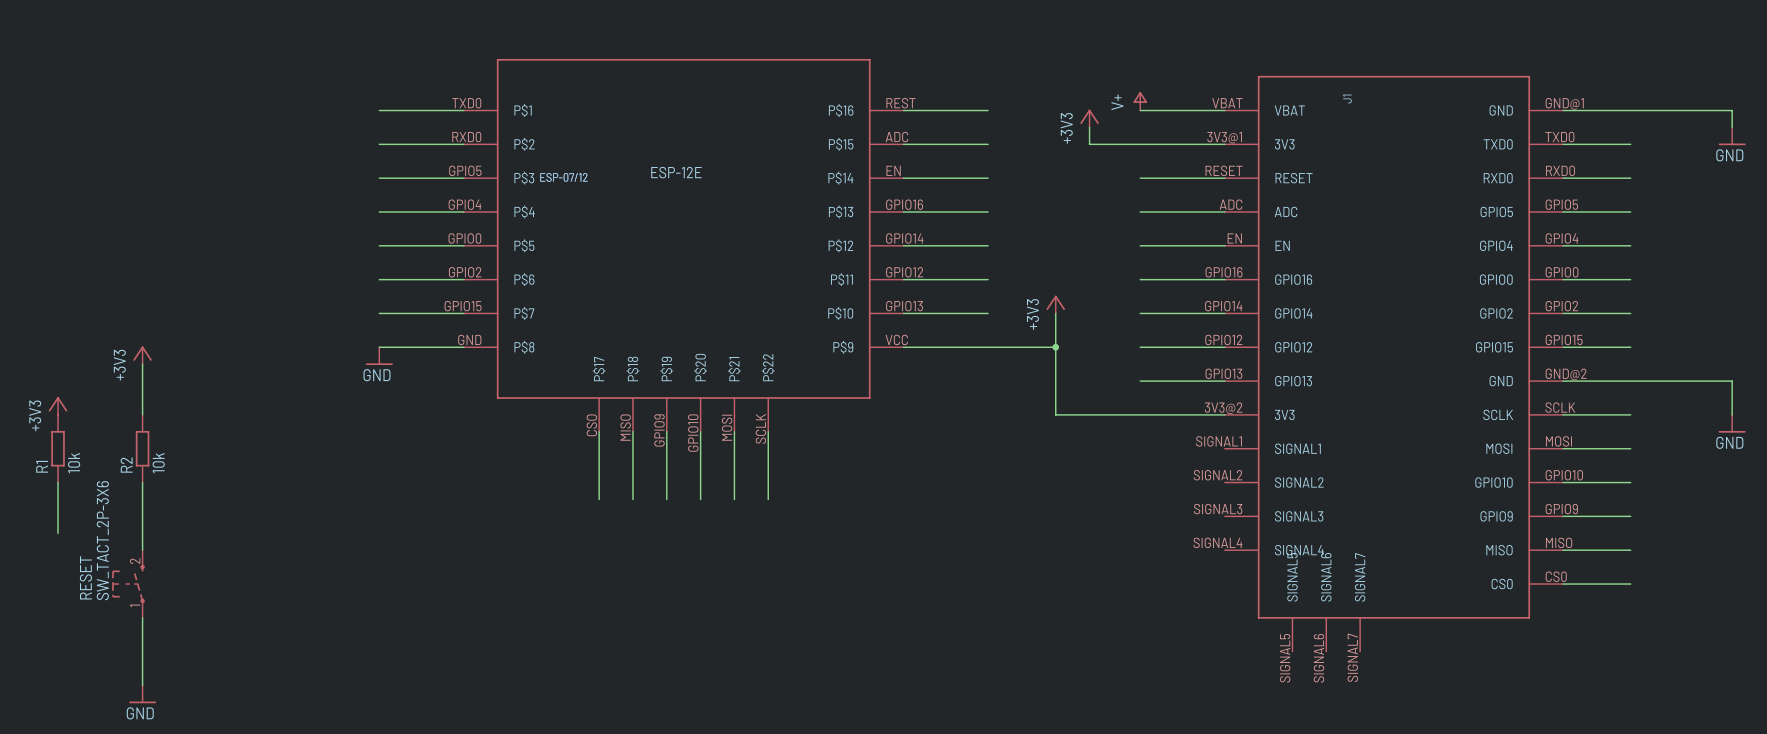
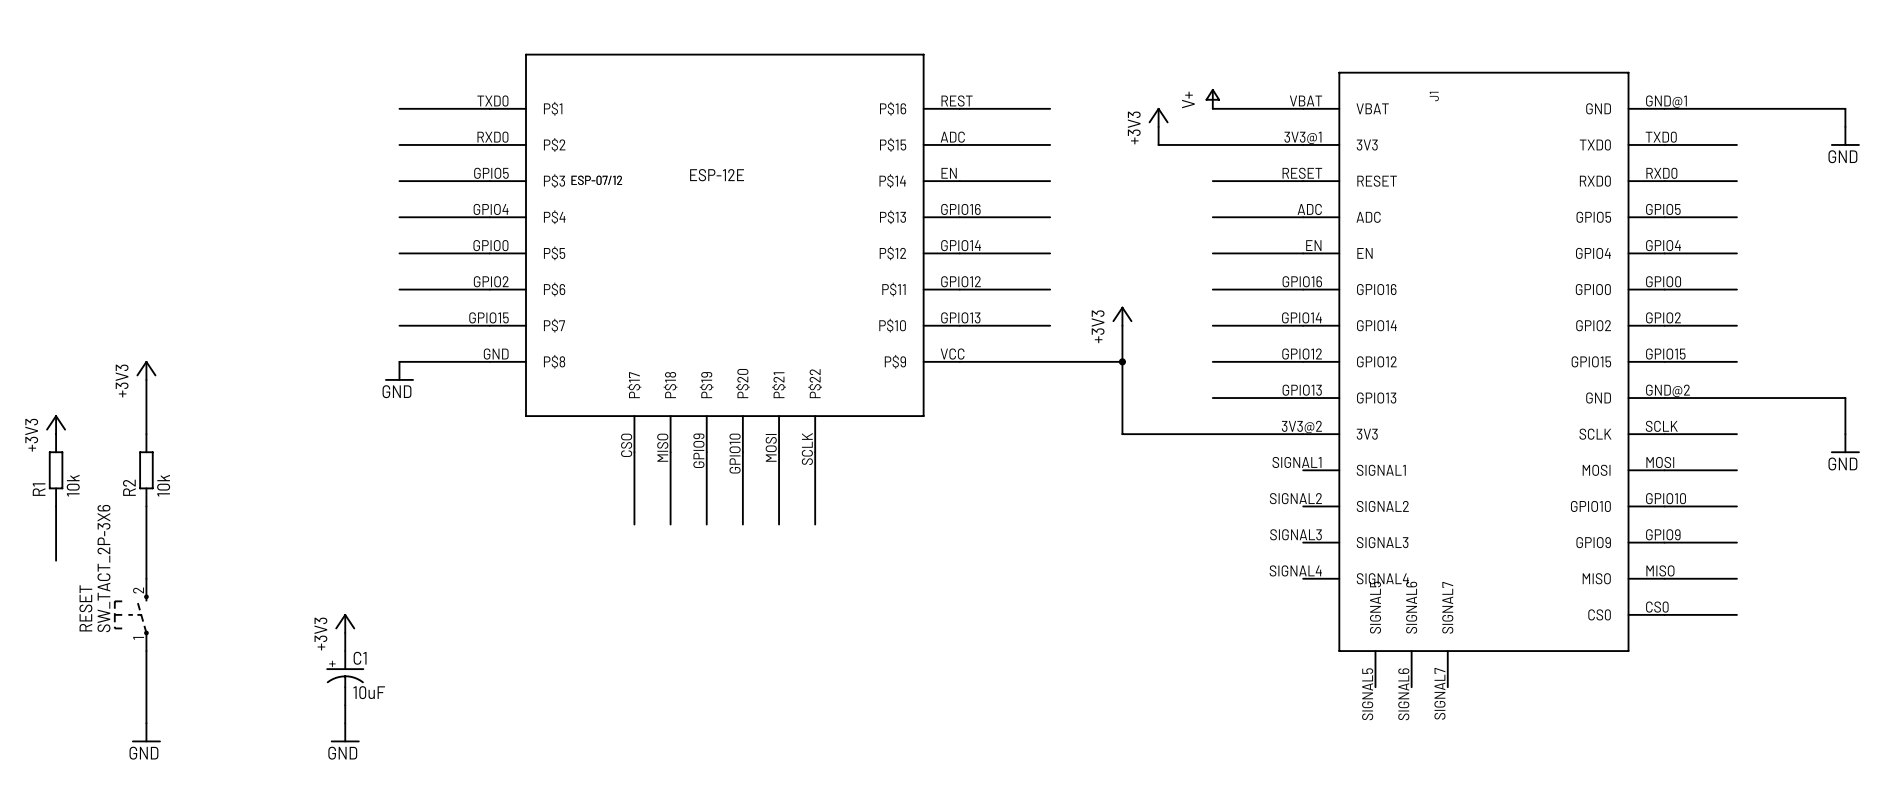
power symbol: none -> +3V3 (345, 623)
wire: none -> (345, 632) (345, 651)
C1: none -> 10uF (345, 678)
wire: none -> (345, 705) (345, 723)
power symbol: none -> GND (345, 732)

